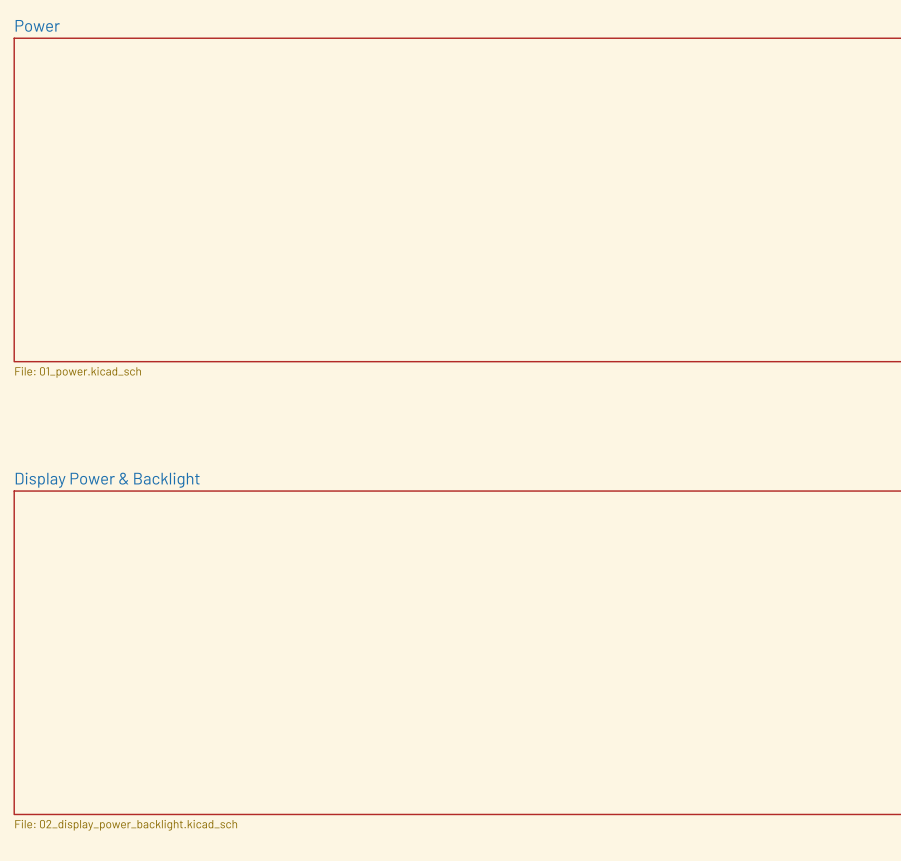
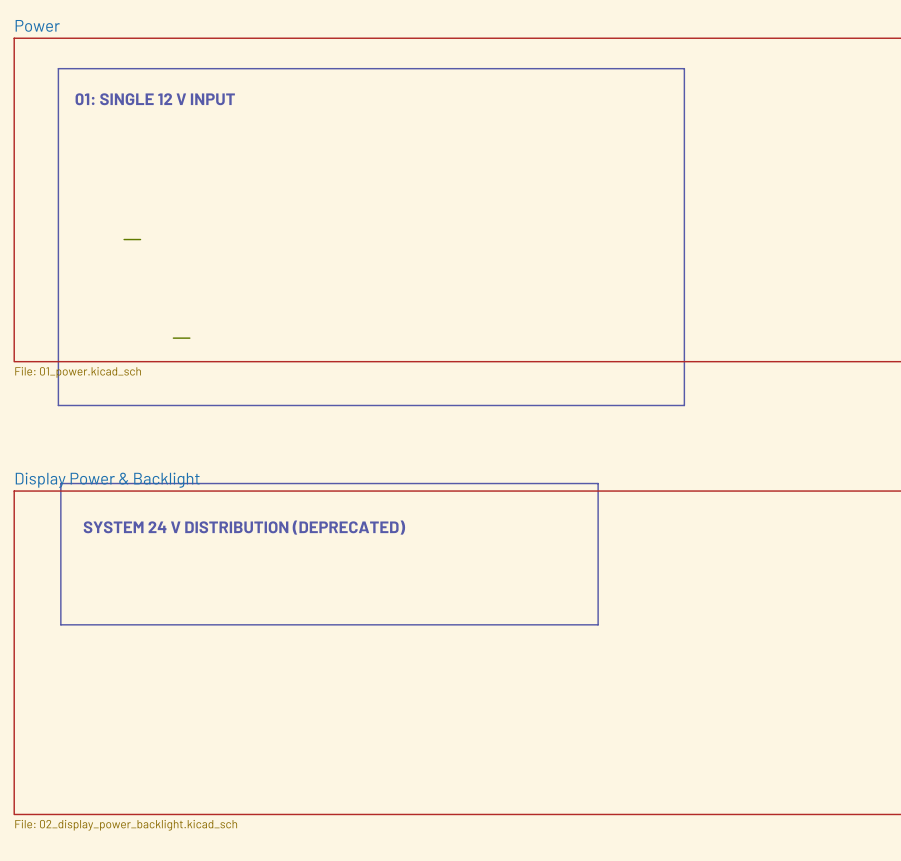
line: none -> (58, 68) (684, 68) (684, 405) (58, 405) (58, 68)
text: none -> 01: SINGLE 12 V INPUT (155, 99)
wire: none -> (124, 239) (140, 239)
wire: none -> (173, 338) (189, 338)
line: none -> (60, 483) (598, 483) (598, 624) (60, 624) (60, 483)
text: none -> SYSTEM 24 V DISTRIBUTION (DEPRECATED) (244, 527)

